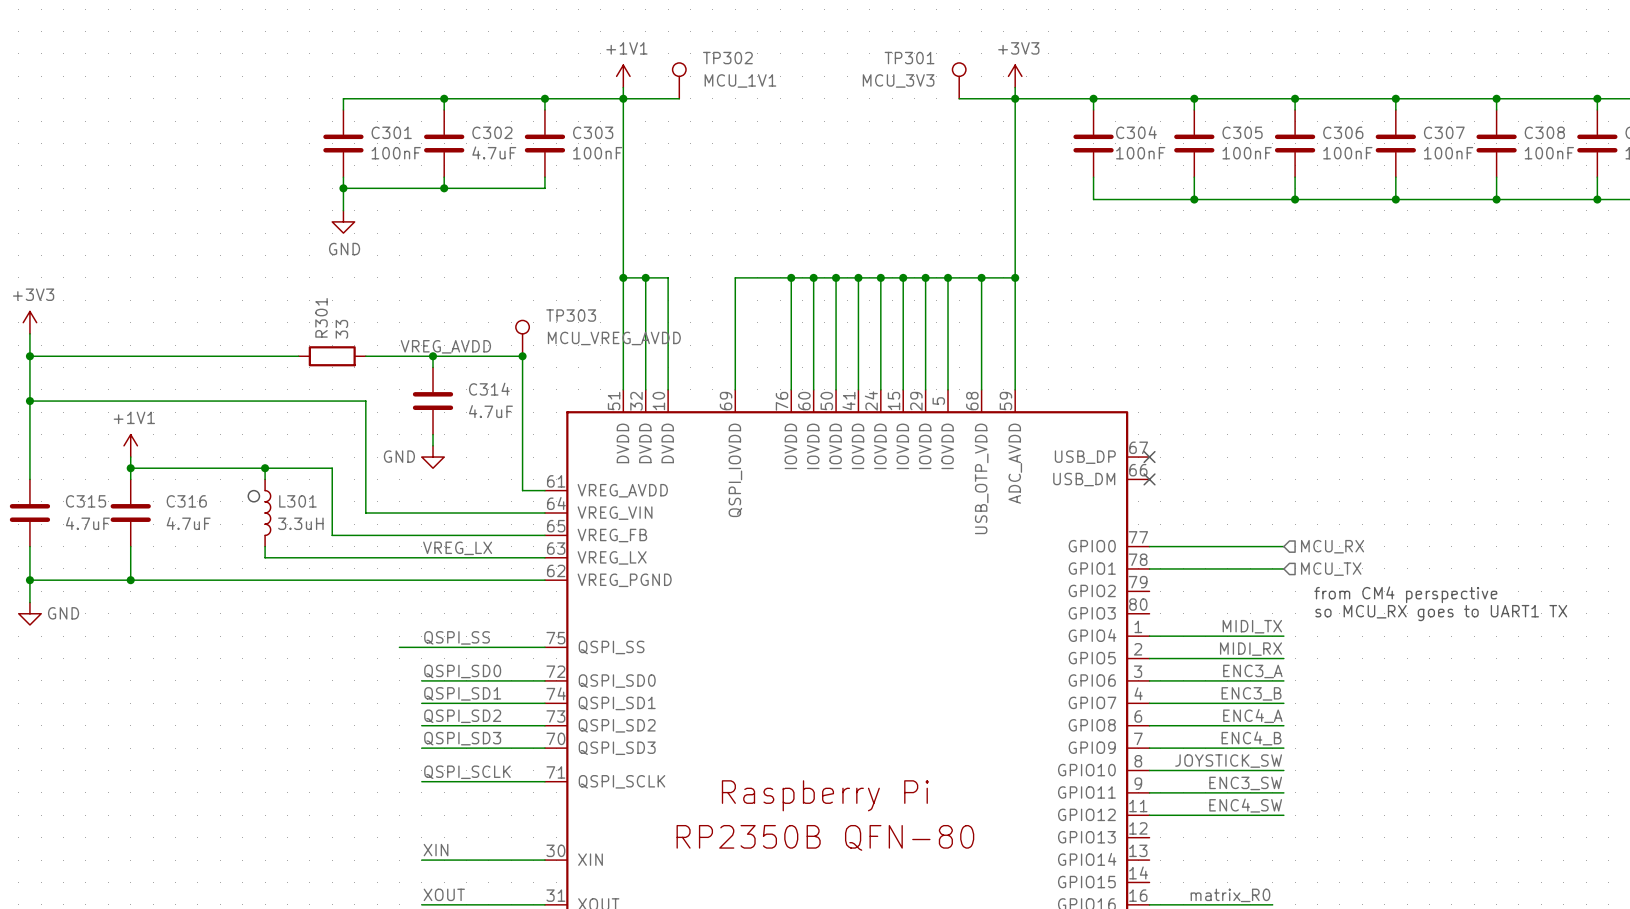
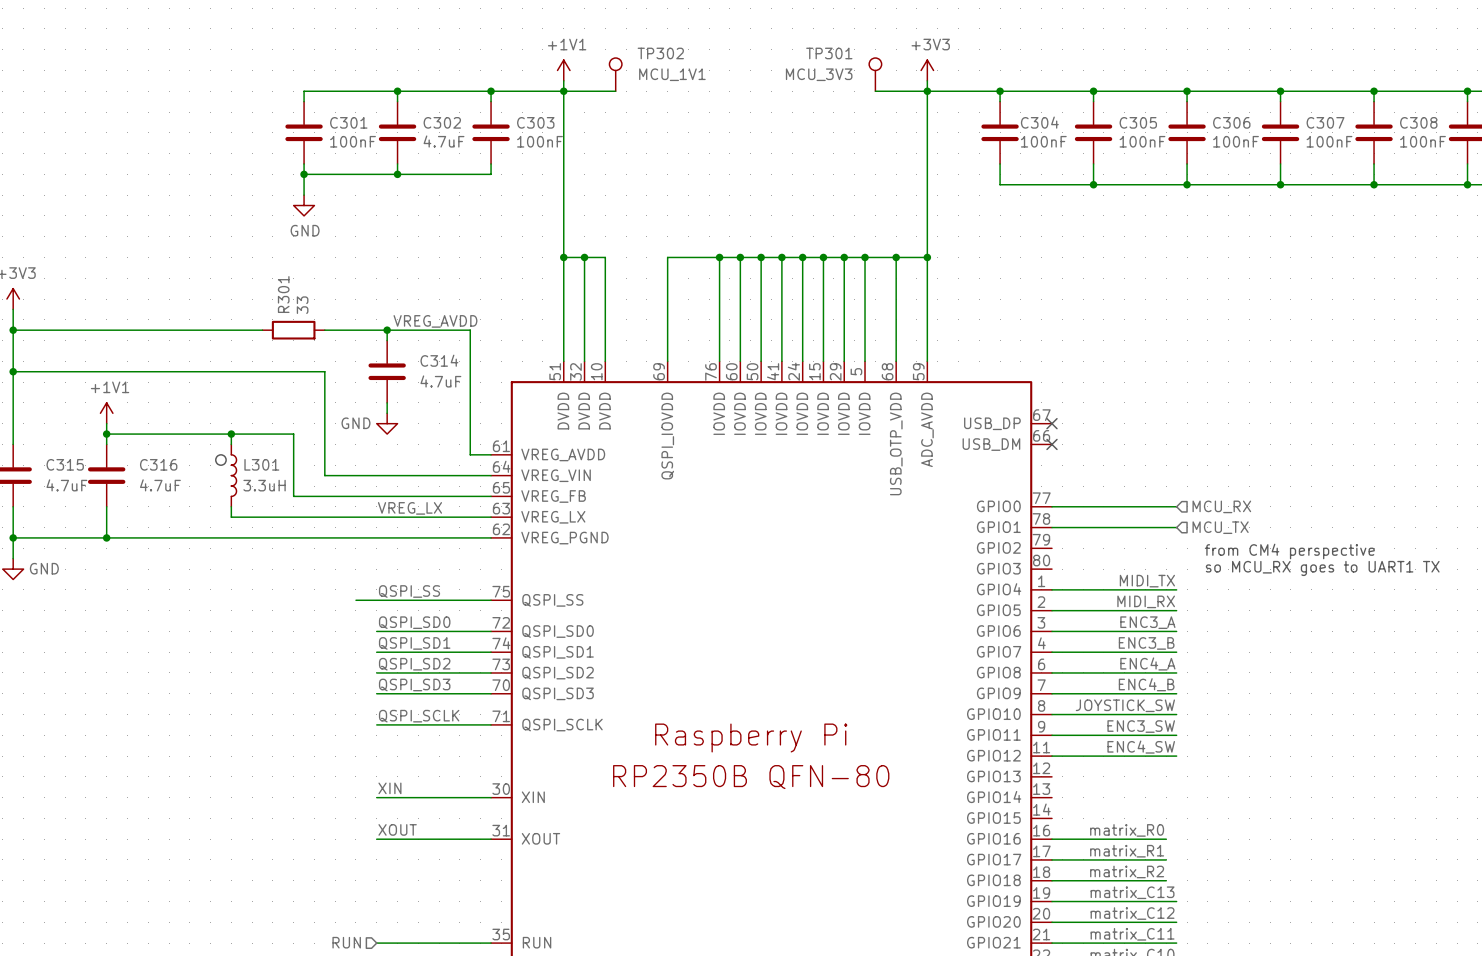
TP303: MCU_VREG_AVDD (522, 338) -> none
label position: VREG_AVDD (445, 346) -> VREG_AVDD (435, 321)
junction: (522, 356) -> none

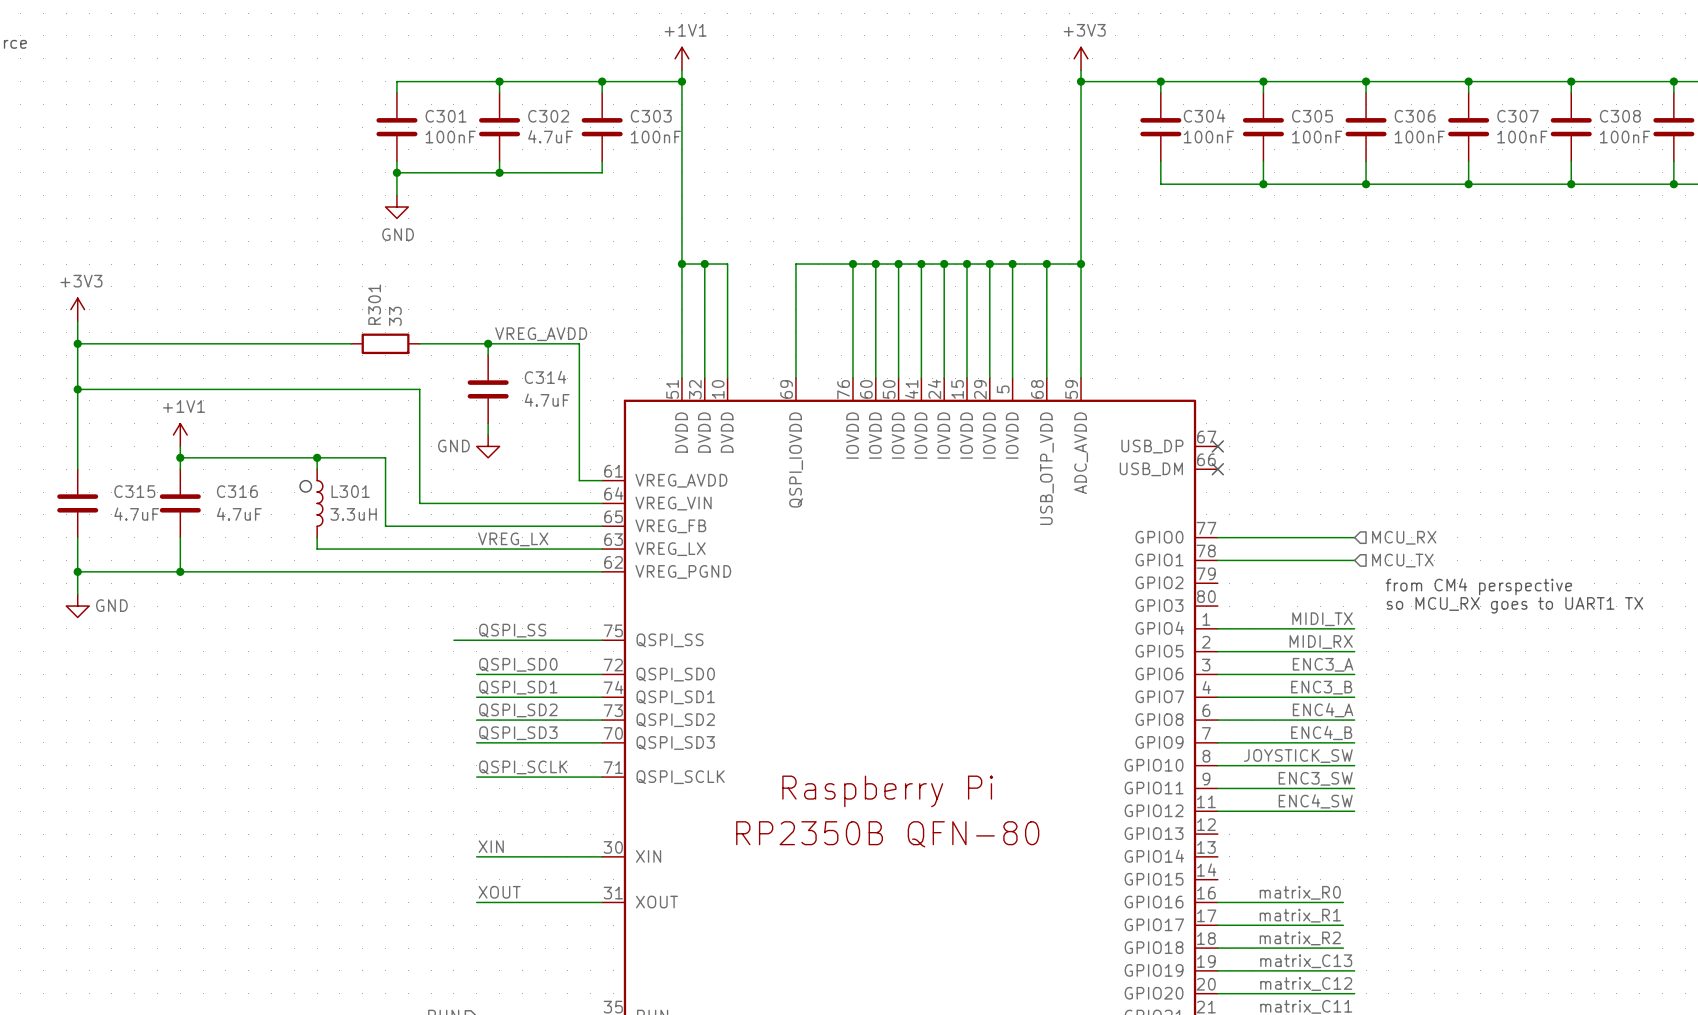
TP302: MCU_1V1 (615, 74) -> none
TP301: MCU_3V3 (875, 74) -> none
wire: (563, 91) (615, 91) -> none
wire: (875, 91) (927, 91) -> none

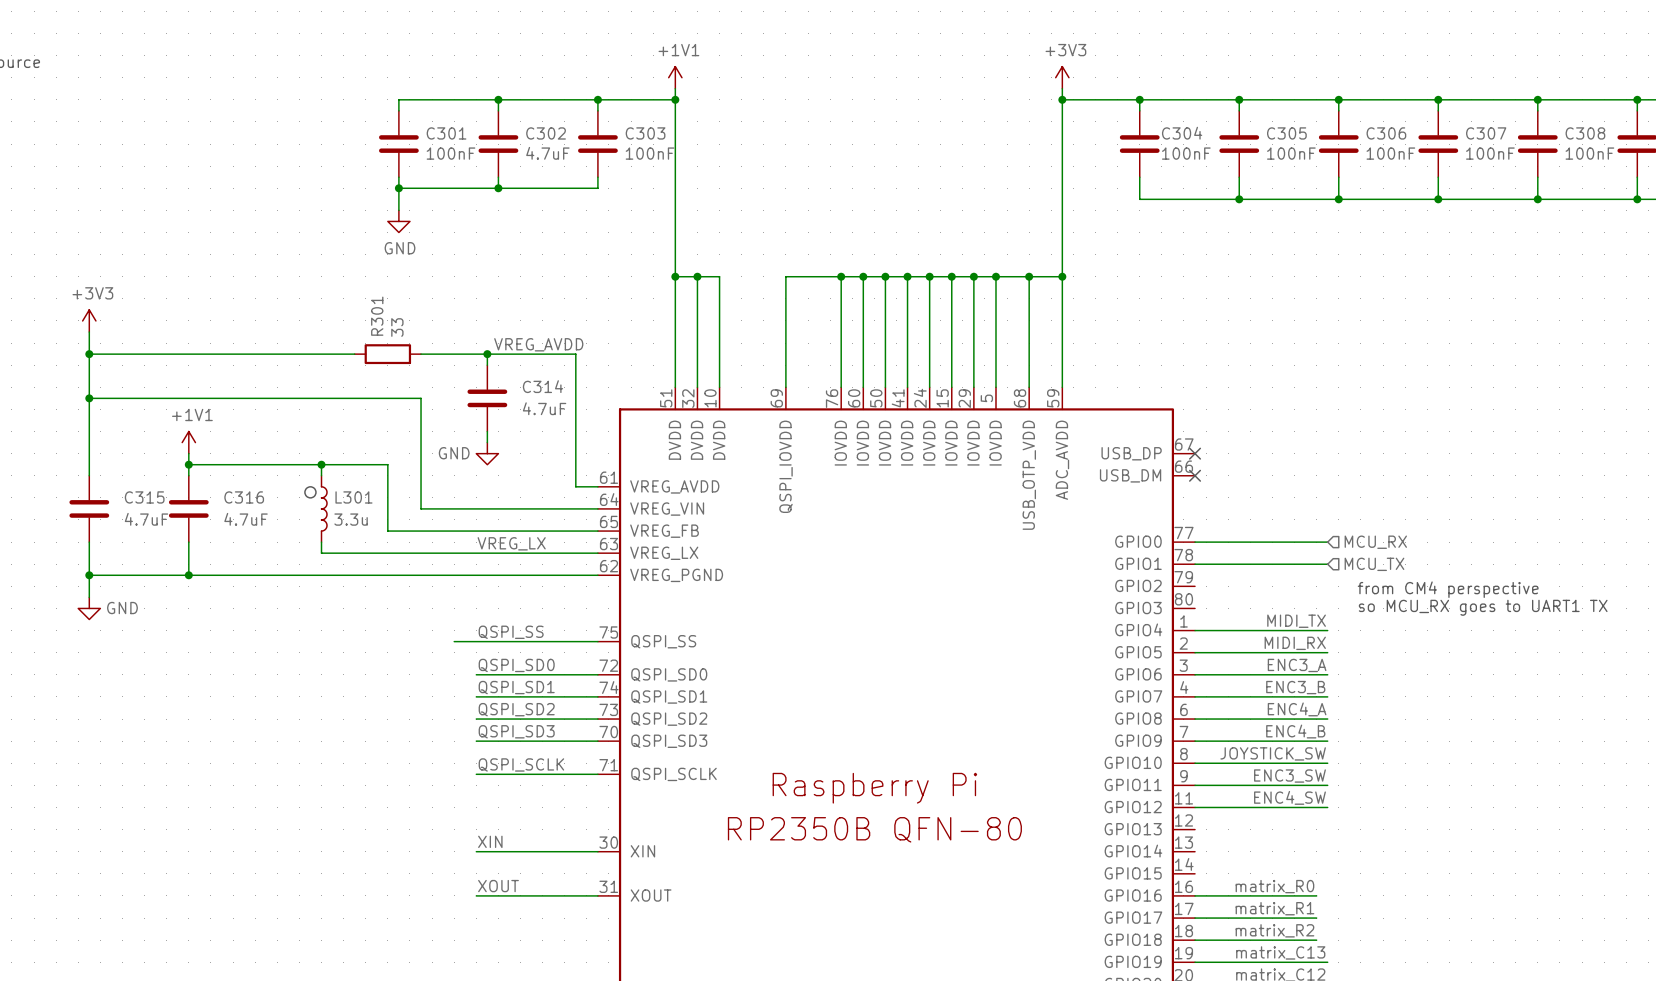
L301 value: 3.3uH (353, 514) -> 3.3u (351, 519)

